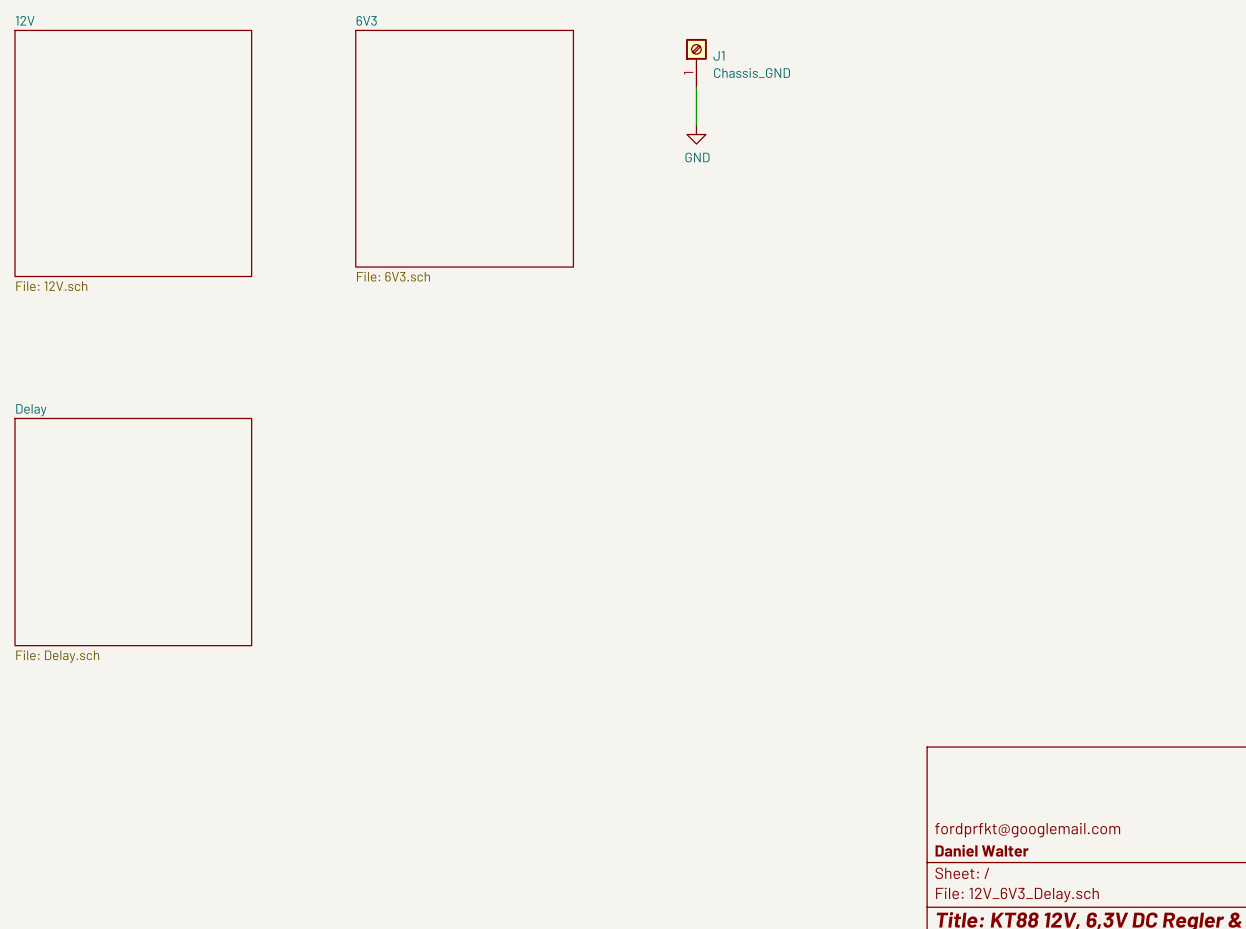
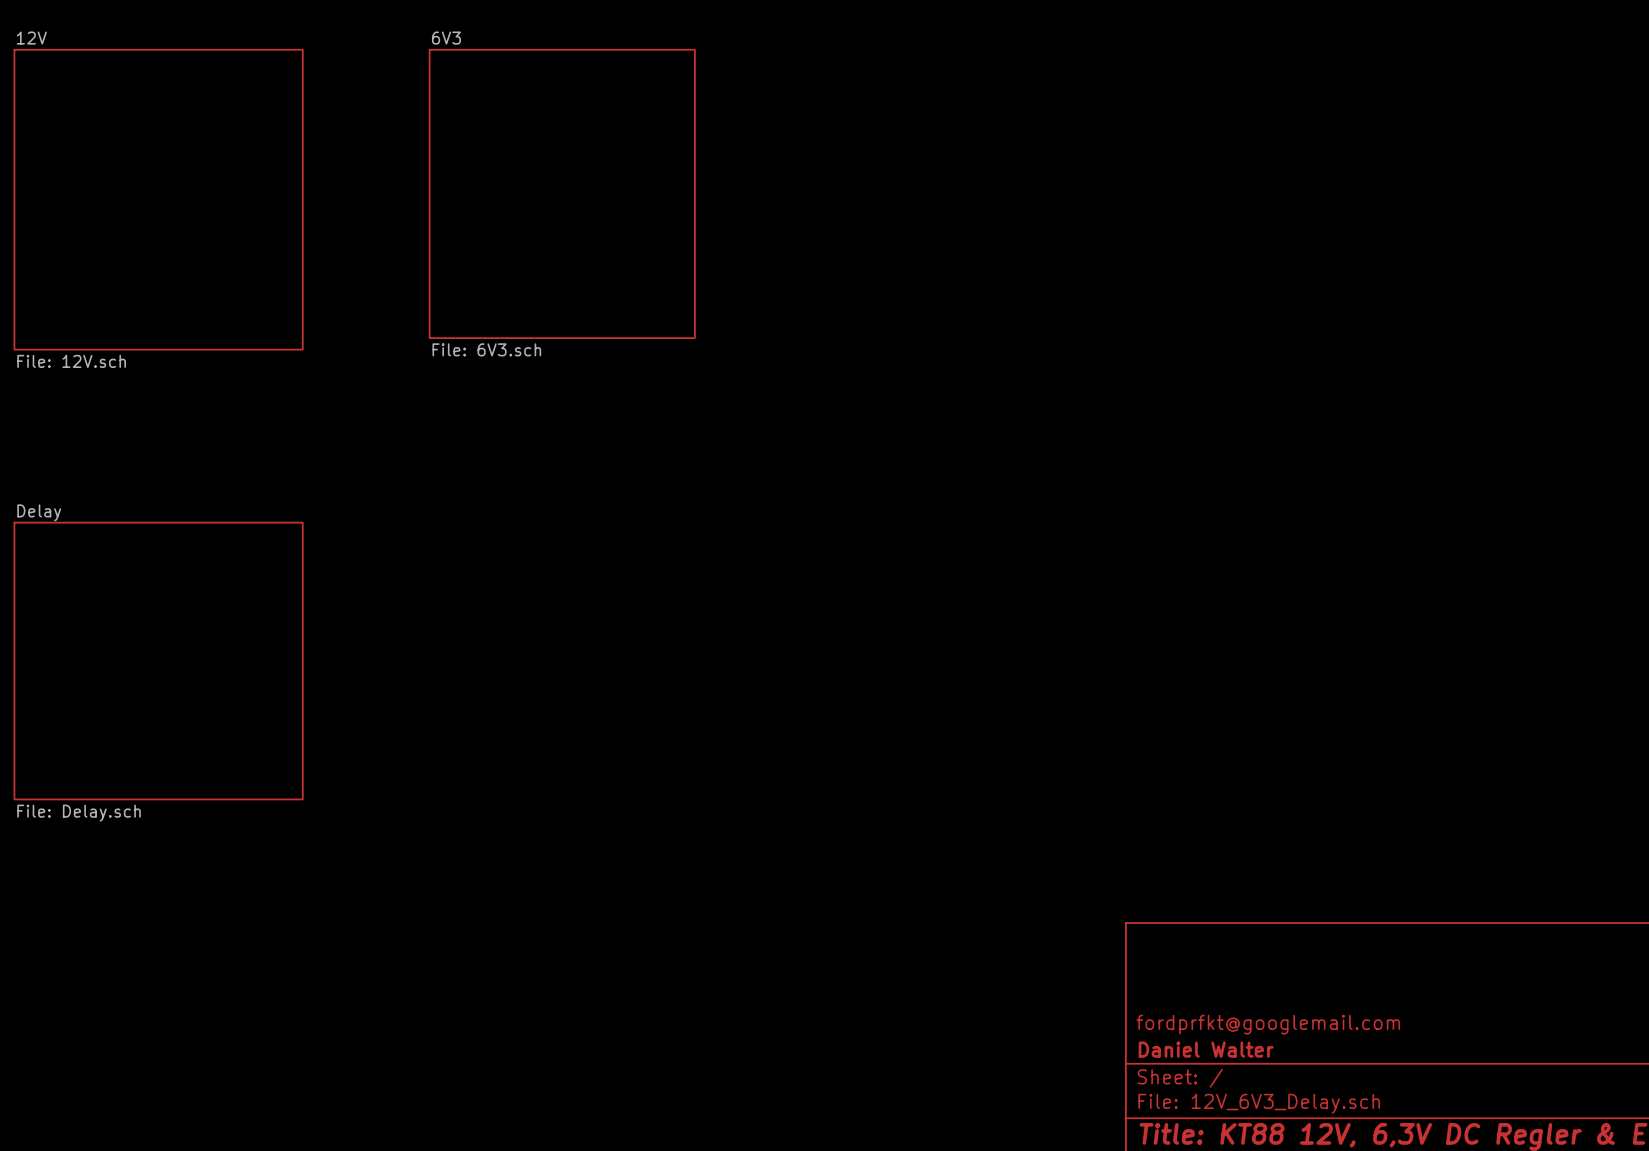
J1: Chassis_GND (696, 63) -> none
wire: (696, 87) (696, 125) -> none
power symbol: GND (696, 134) -> none

